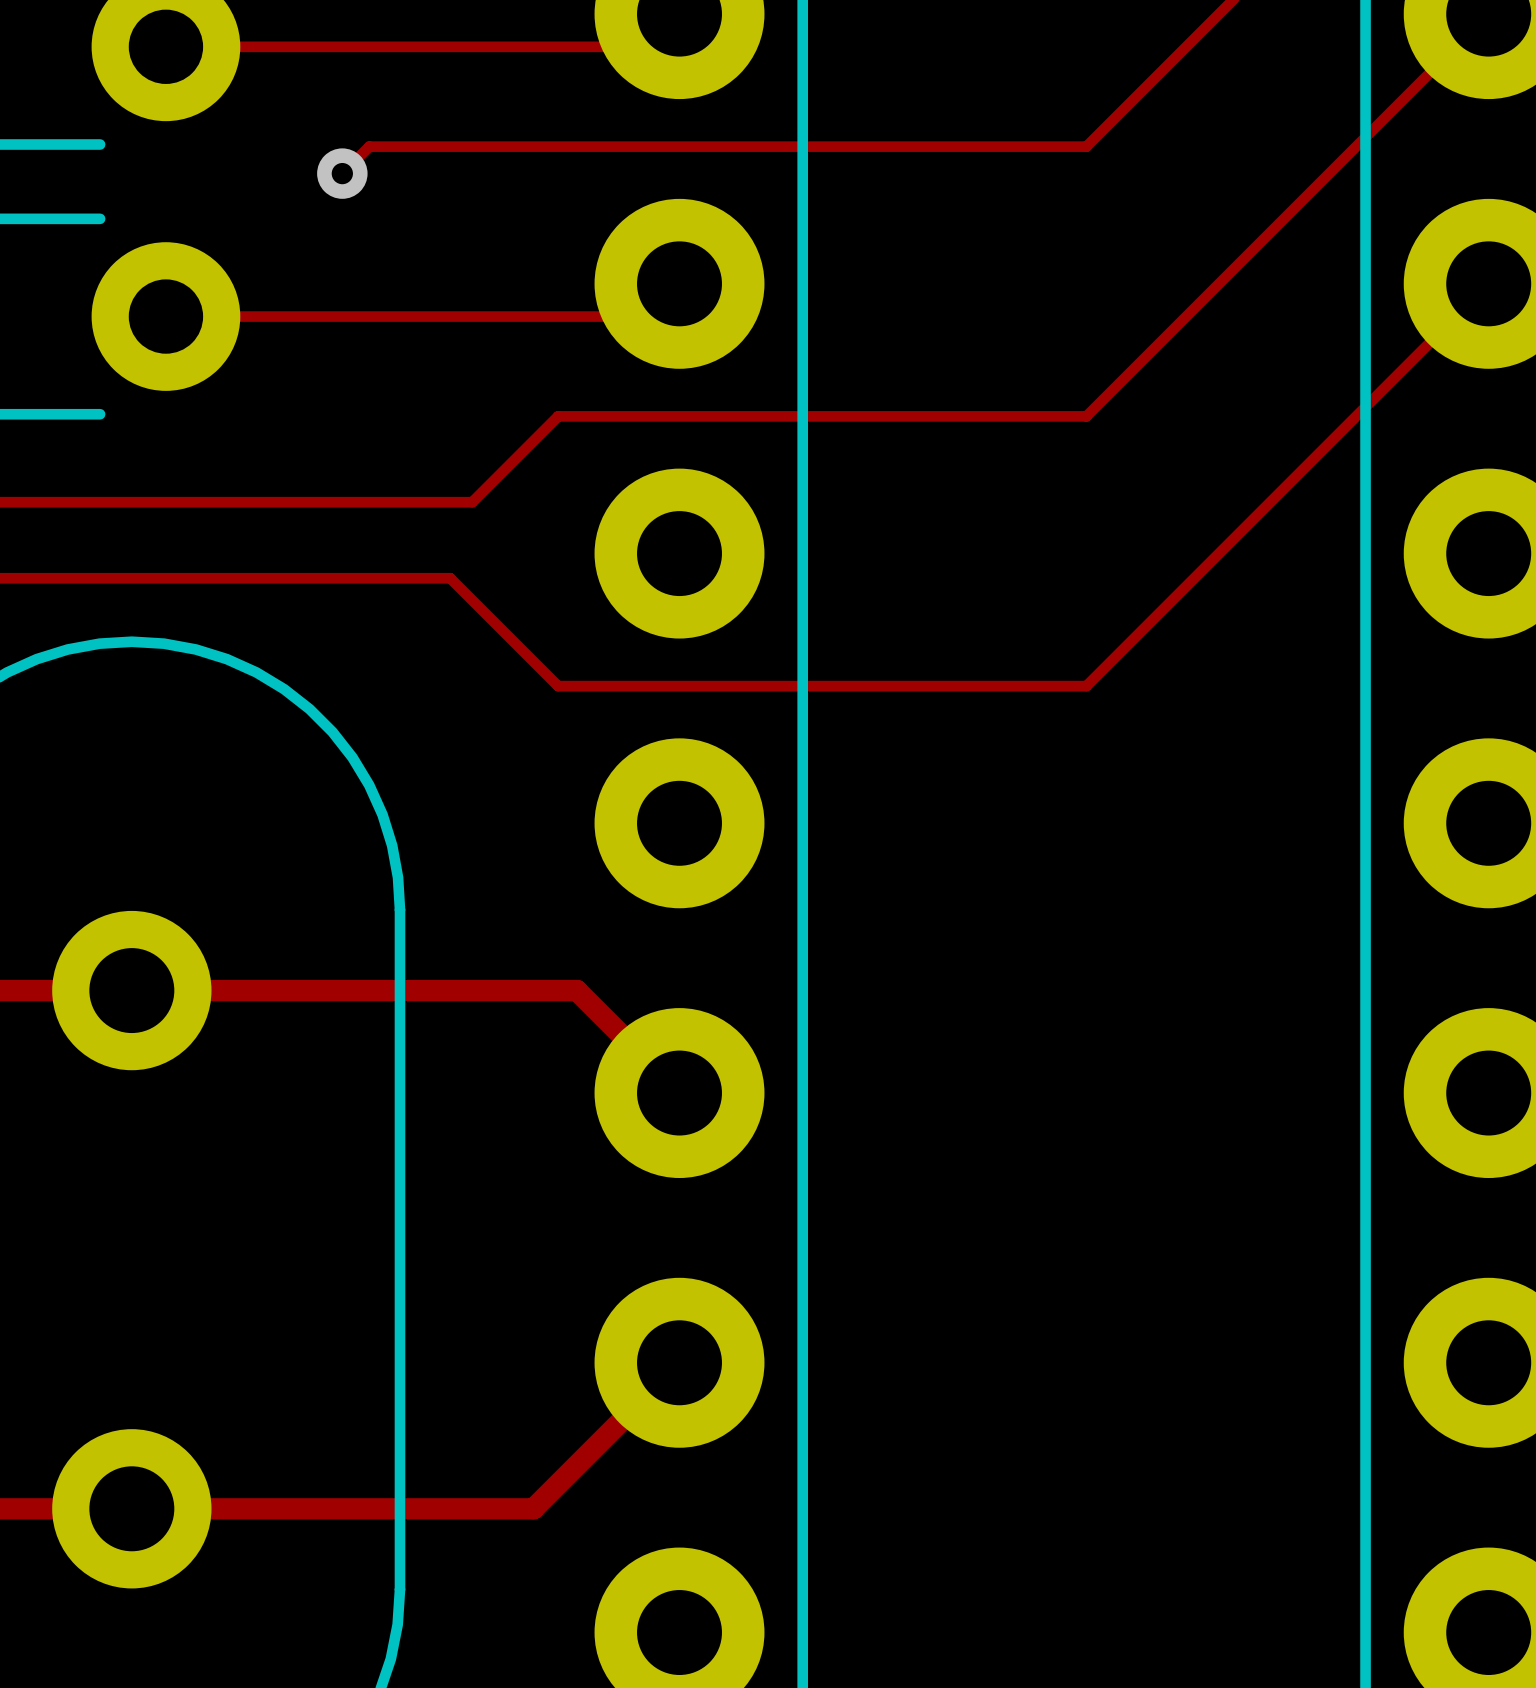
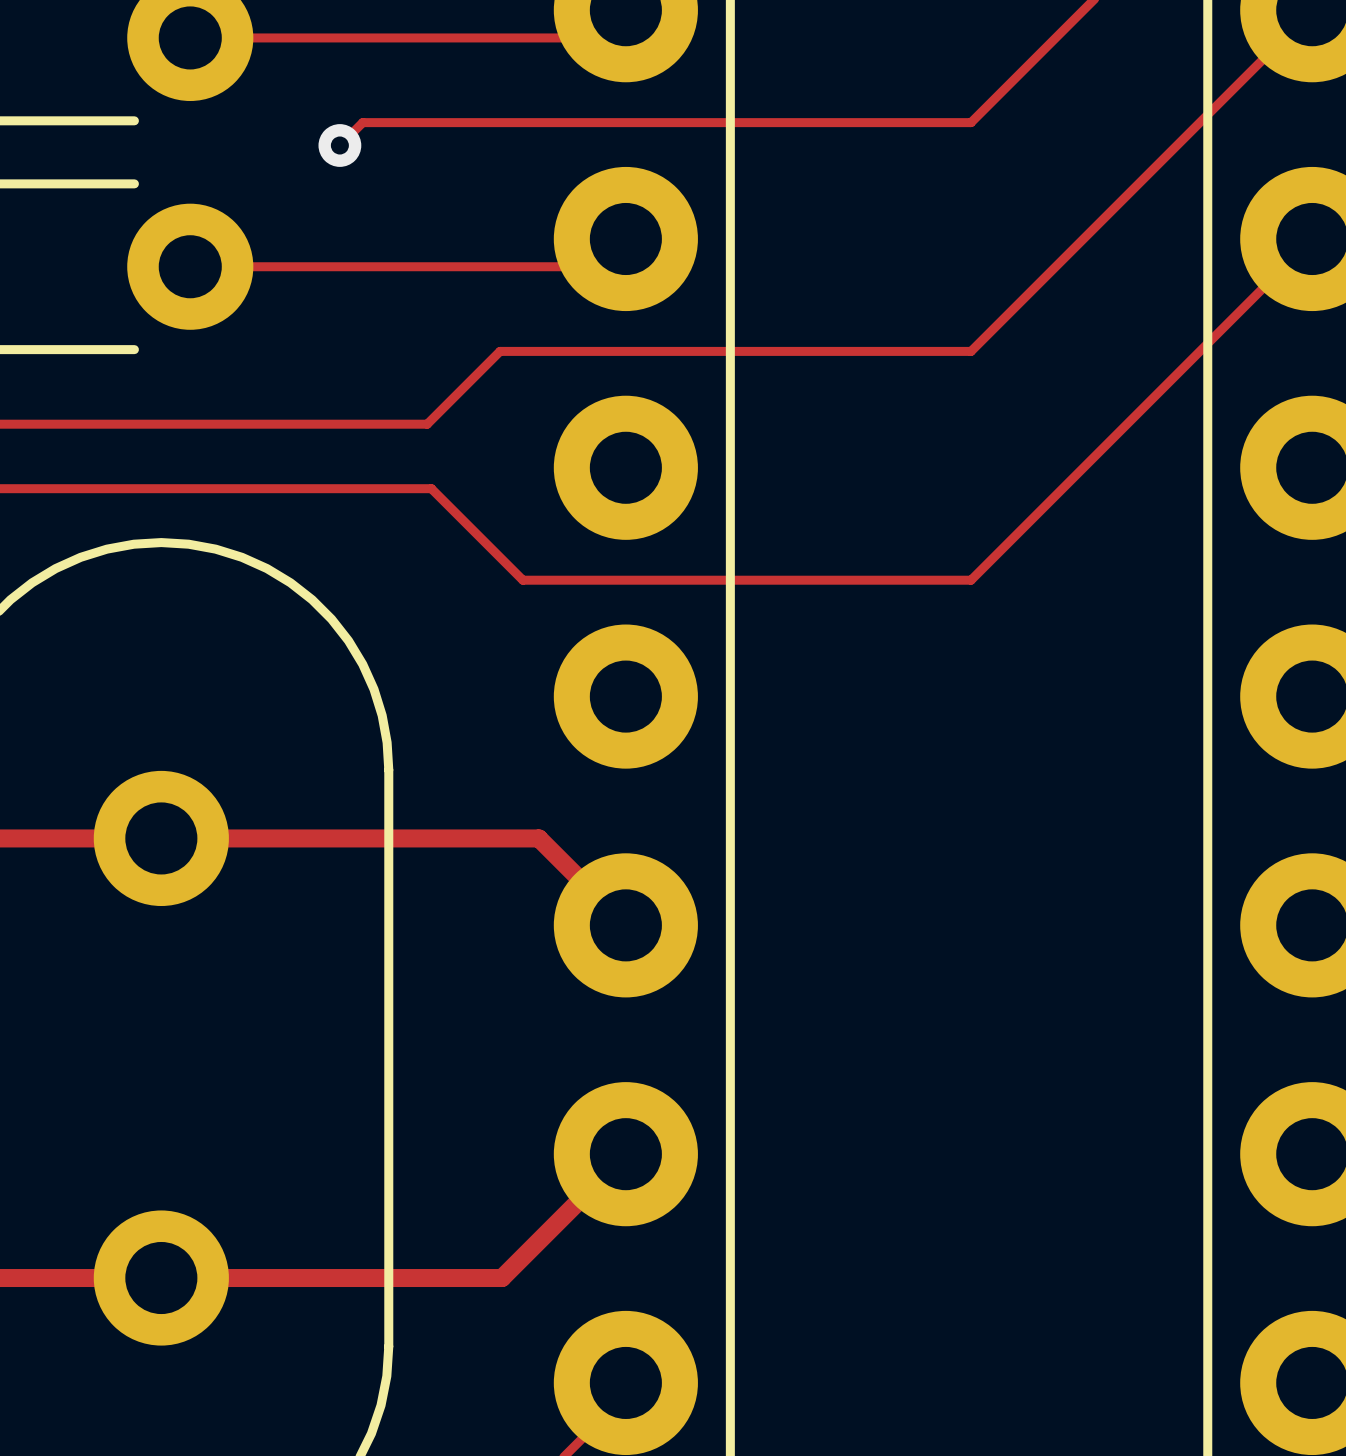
track: (558, 416) (472, 502) (445, 502) -> (522, 351) (500, 351) (427, 424)

